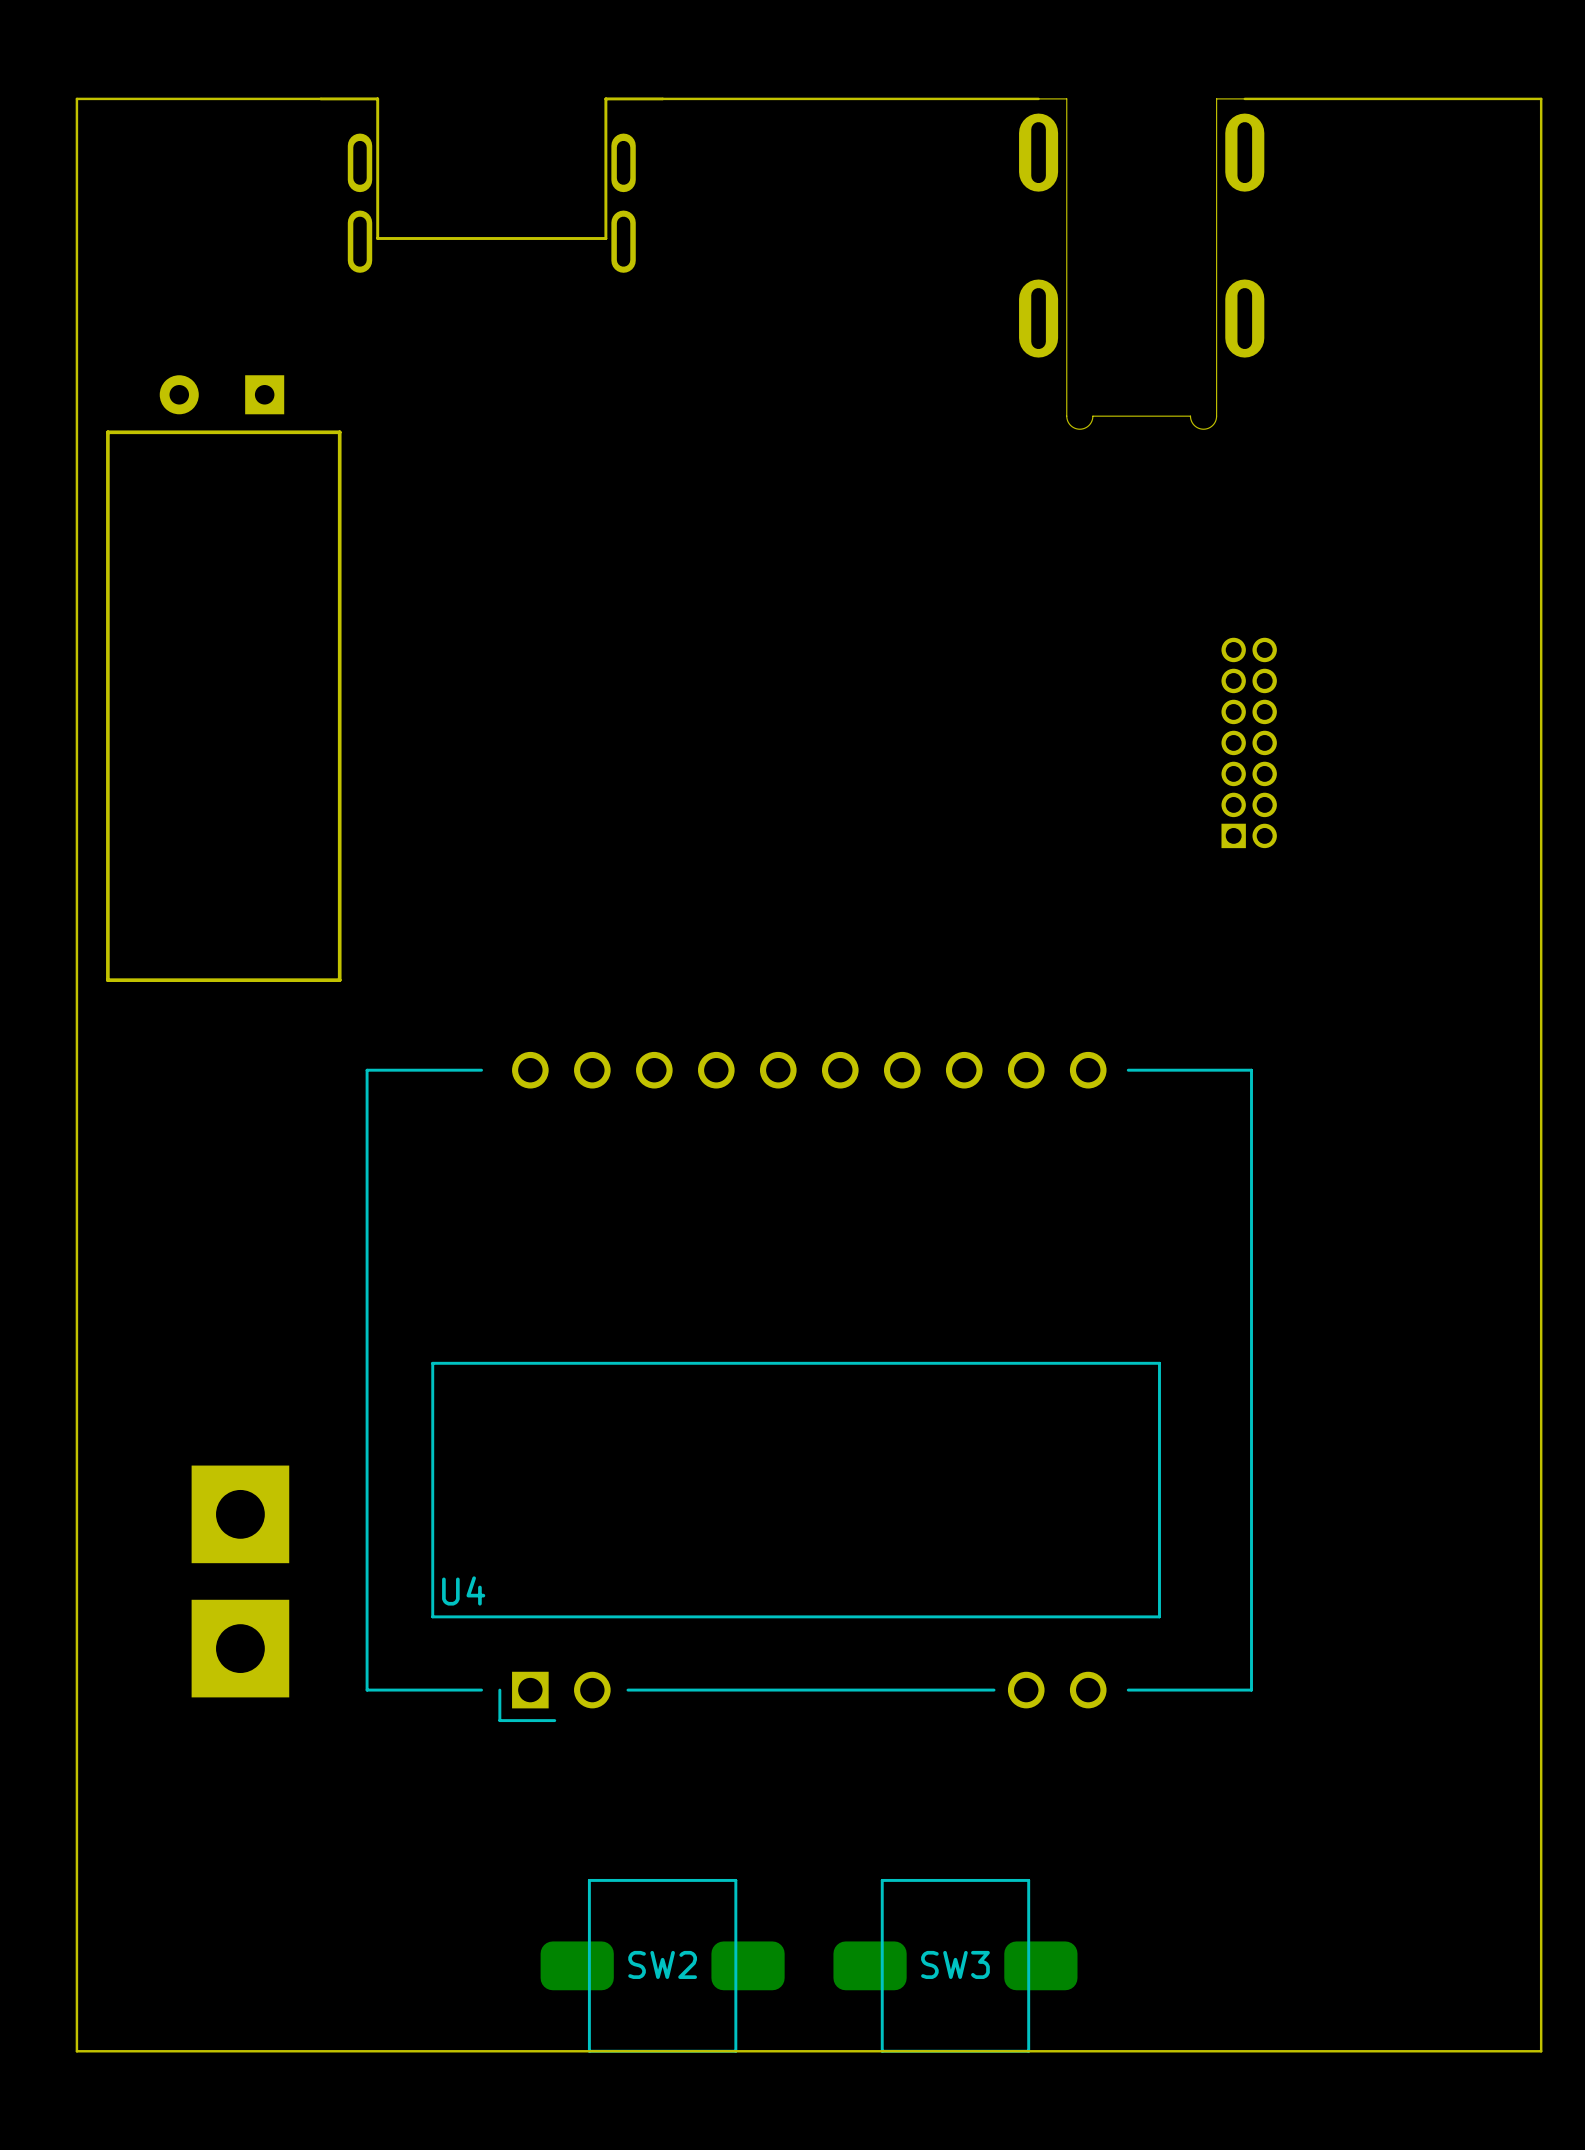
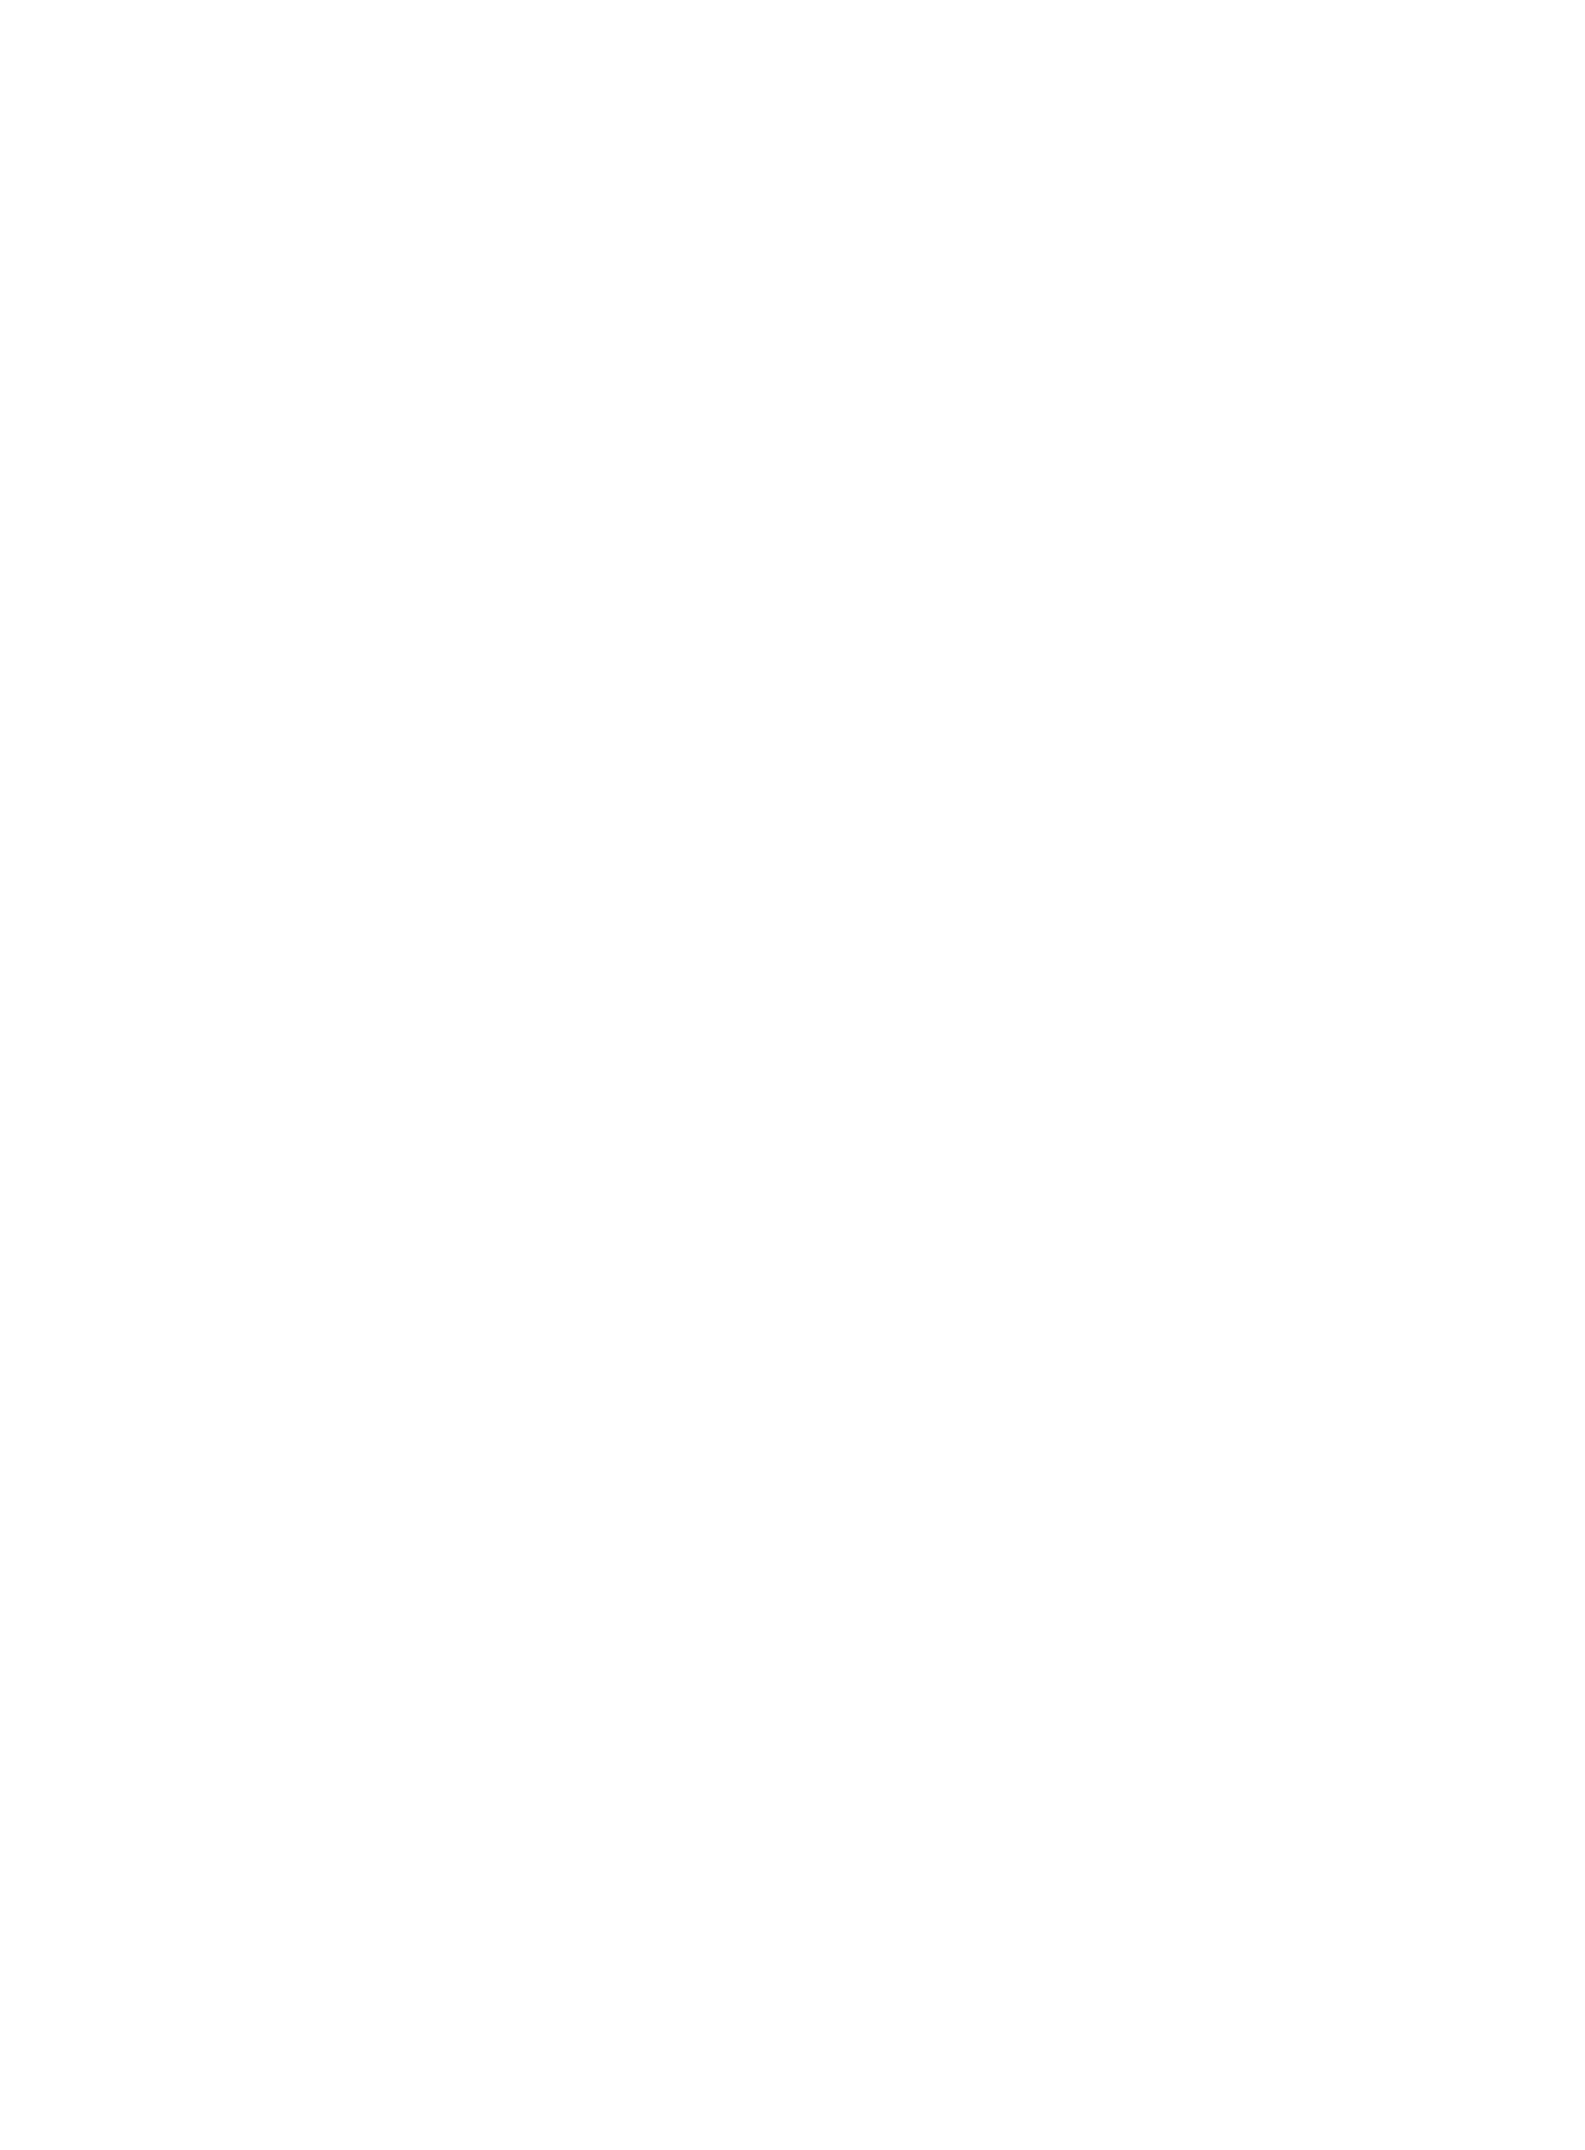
board edge: (1038, 98) (662, 98) -> none
board edge: (1244, 98) (1541, 98) (1541, 2051) (76, 2051) (76, 98) (320, 98) -> none
part: (491, 185) -> none
part: (1141, 264) -> none
part: (221, 394) -> none
board edge: (339, 432) (339, 980) (107, 980) (107, 432) (339, 432) -> none
part: (1249, 742) -> none
U4: (809, 1386) -> none
part: (240, 1514) -> none
part: (240, 1648) -> none
SW2: (662, 1965) -> none
SW3: (955, 1965) -> none

